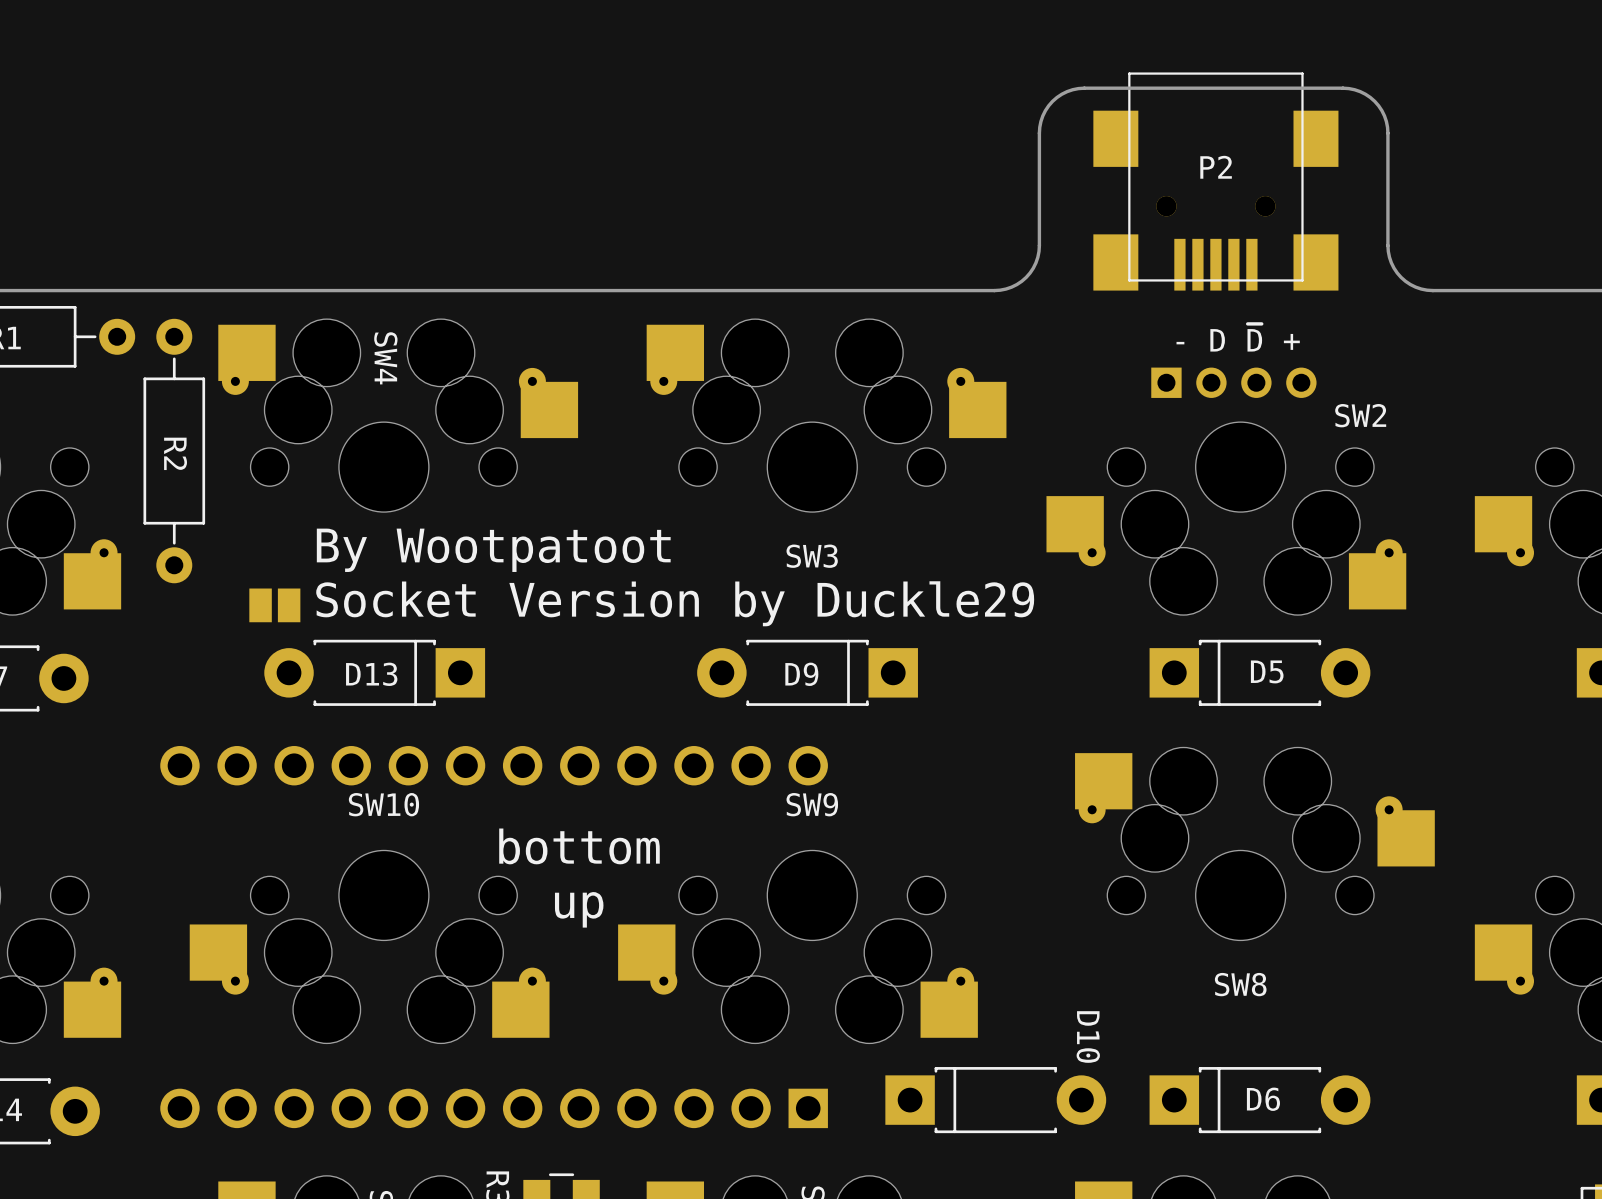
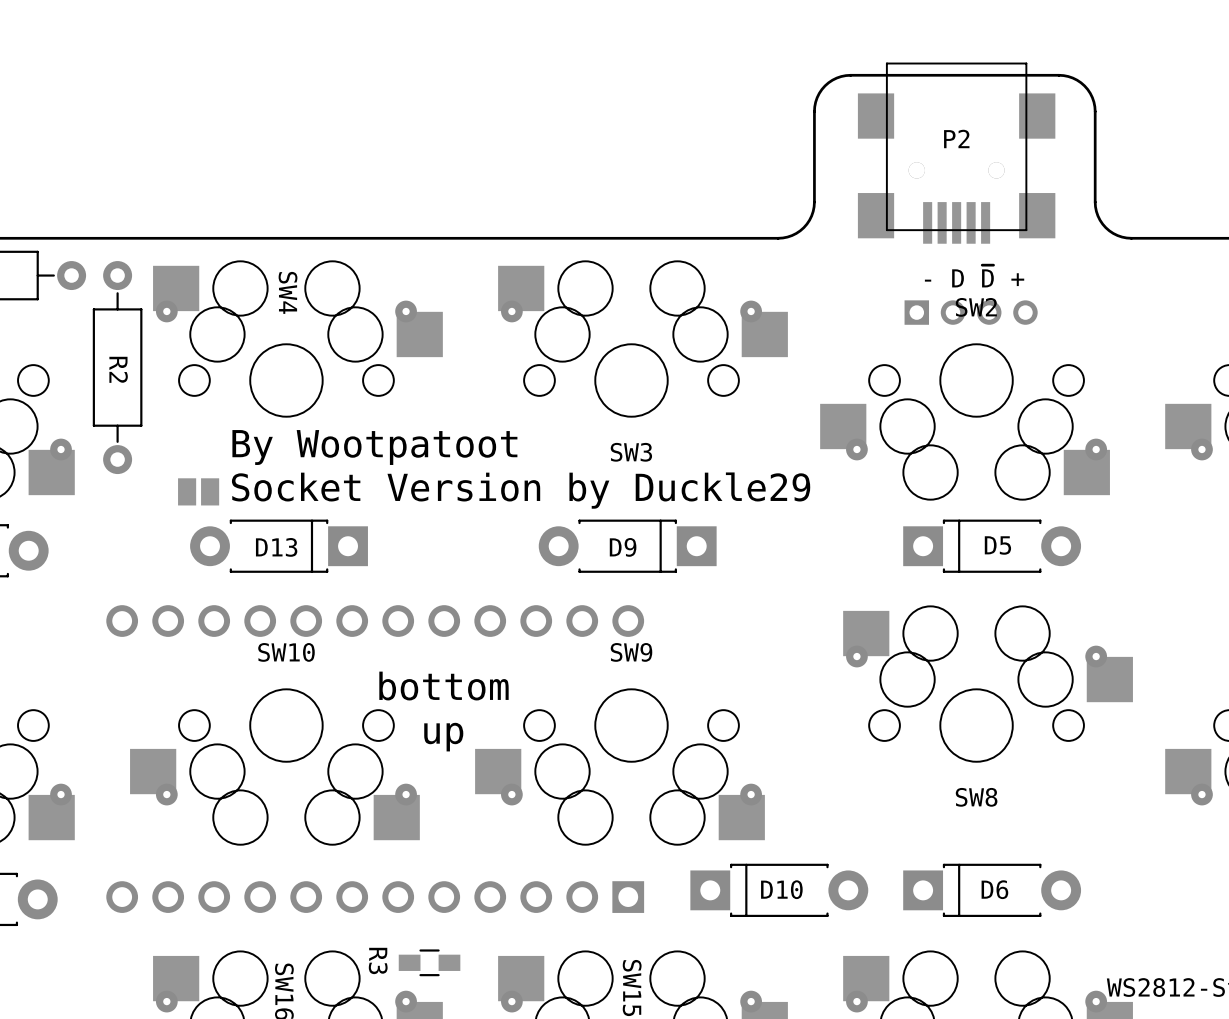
P2 footprint: [1093, 72, 1339, 291] -> [857, 62, 1056, 244]
SW2 name position: SW2 (1360, 415) -> SW2 (976, 307)
D10 name rotation: 0° (1088, 1037) -> 90° counterclockwise (781, 889)
D10 name position: D10 (1088, 1037) -> D10 (781, 889)

